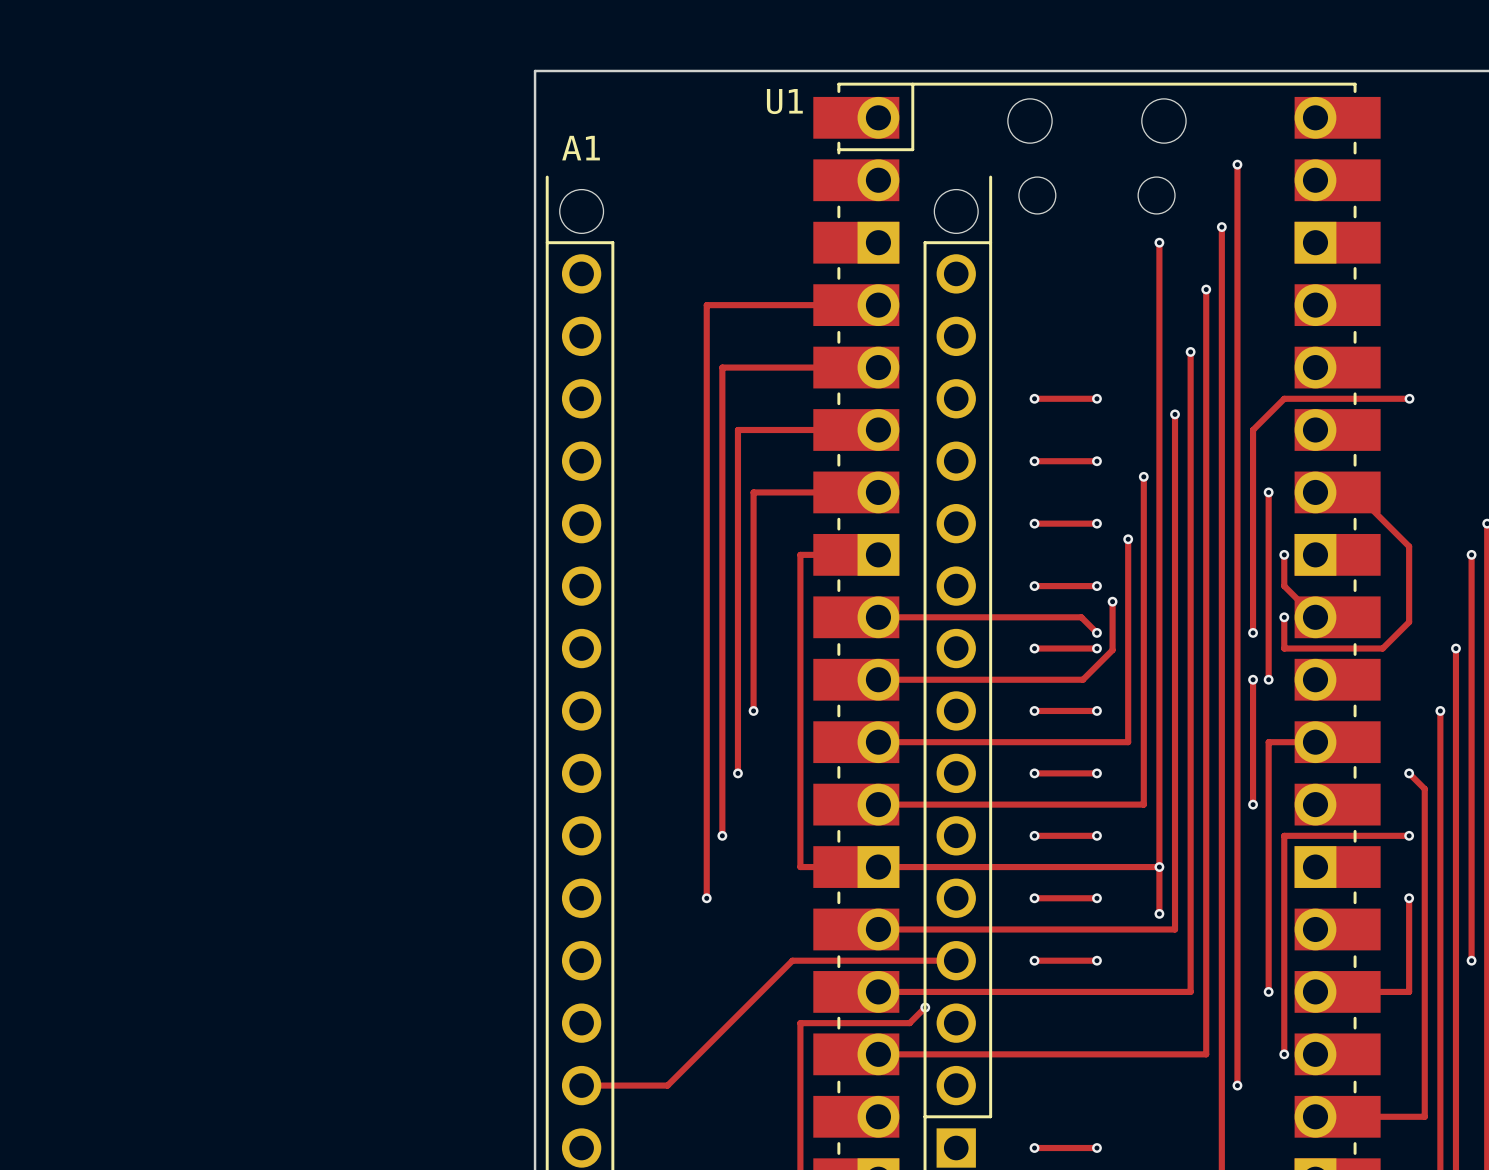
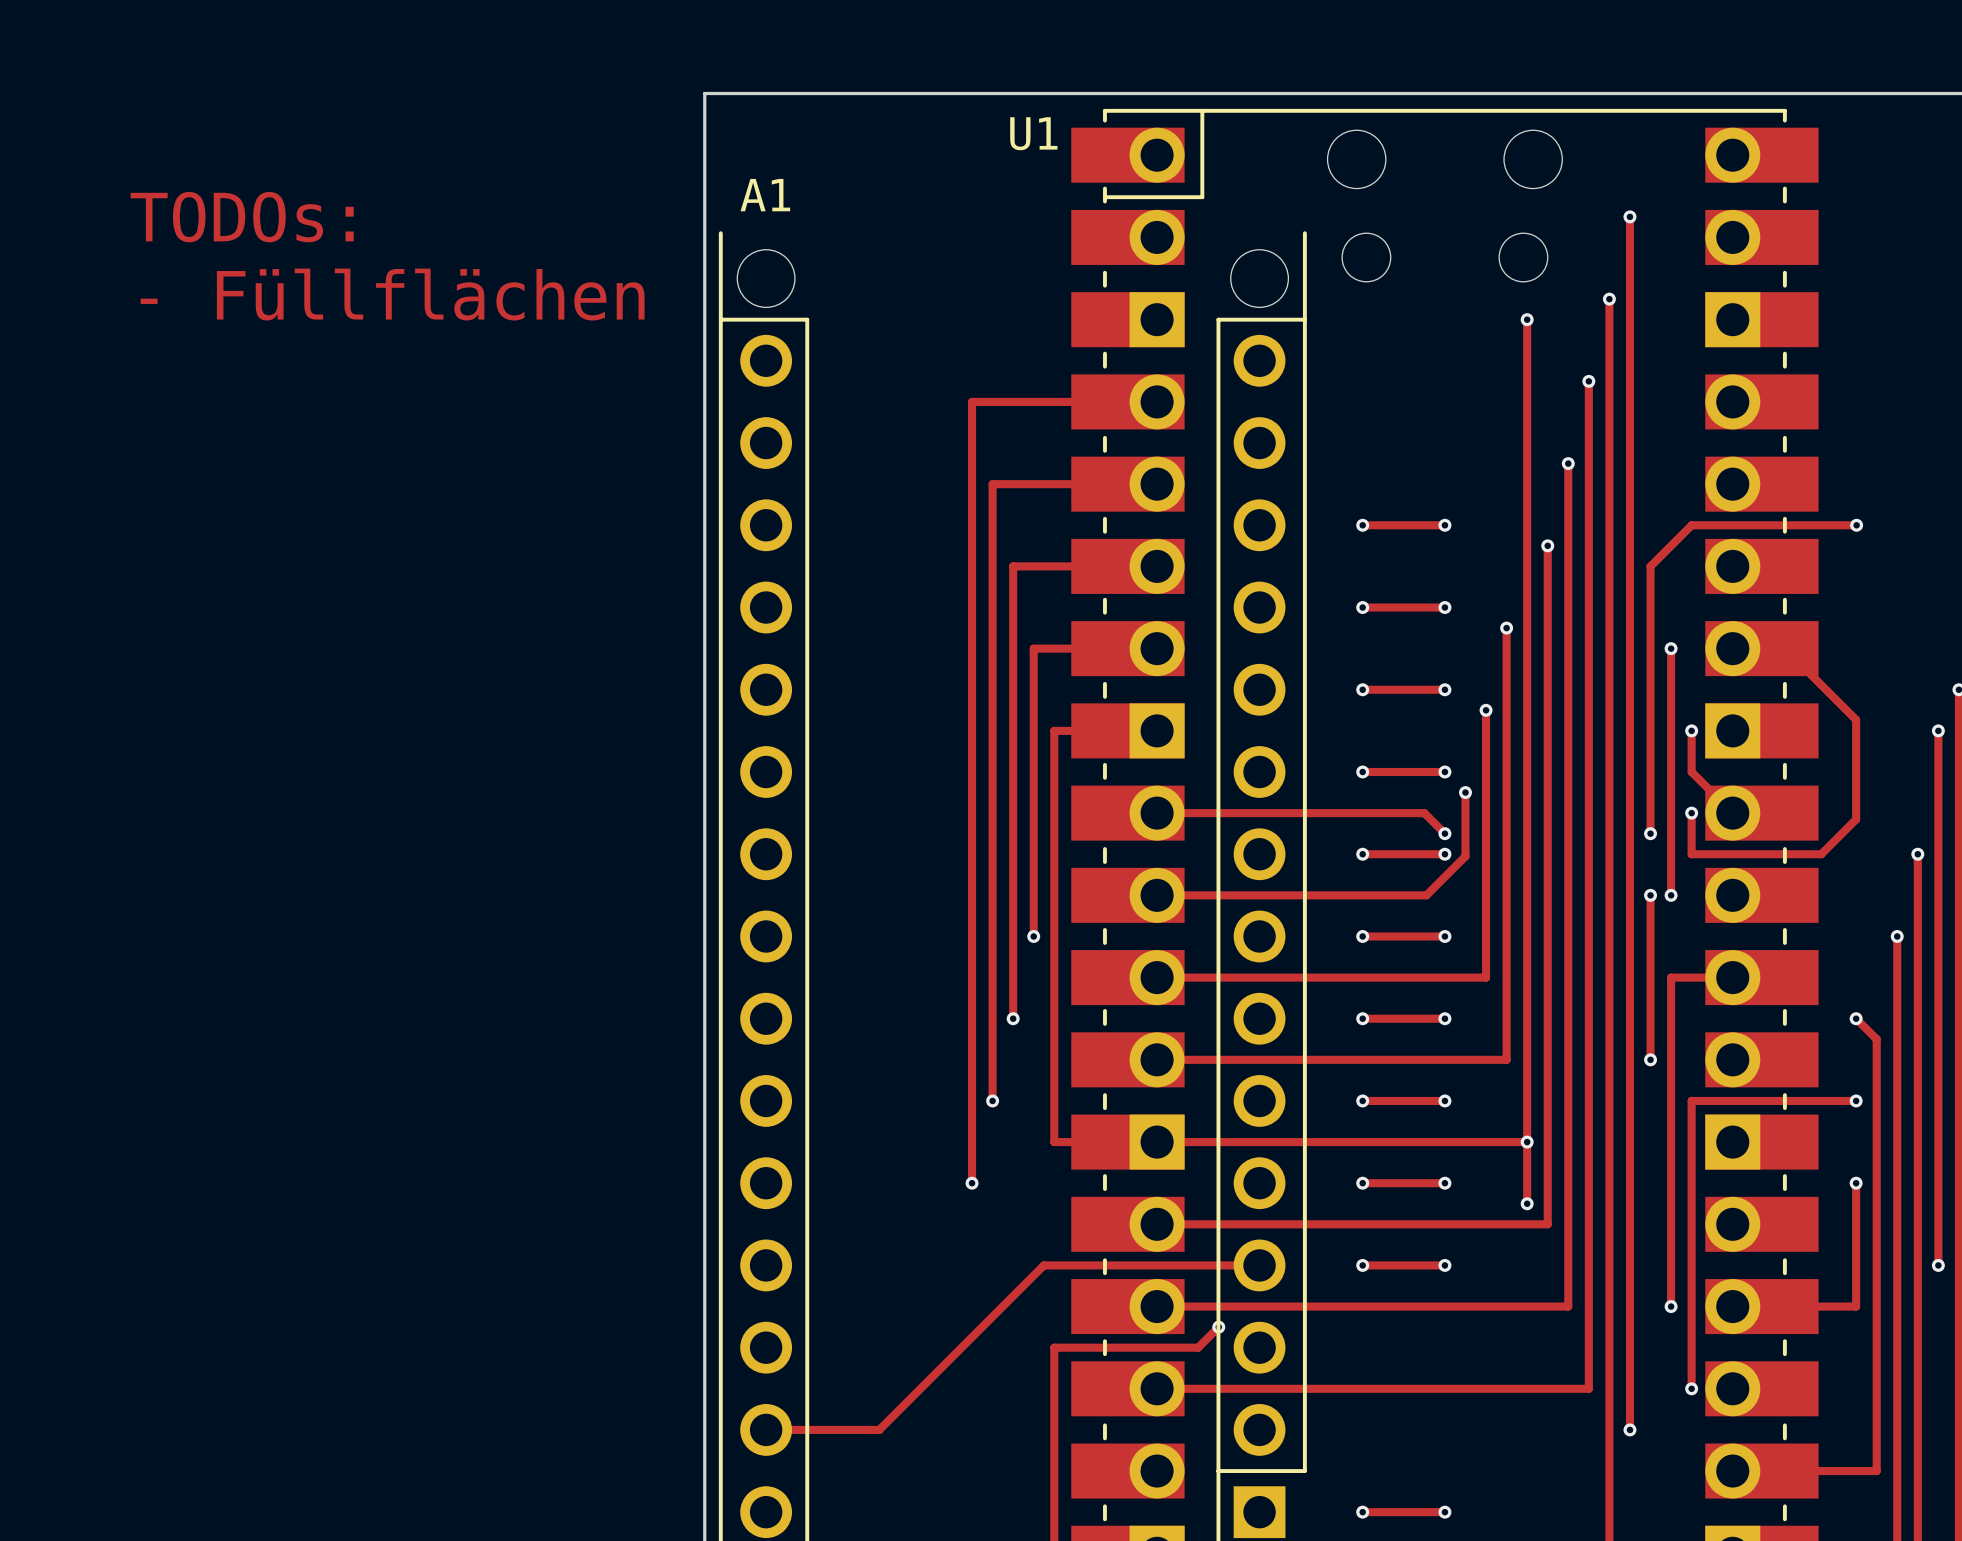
text: none -> TODOs: (242, 217)
text: none -> - Füllflächen (392, 294)
track: (737, 305) (706, 305) (706, 898) -> none
track: (753, 367) (722, 367) (722, 835) -> none
track: (737, 430) (769, 430) -> (972, 566) (972, 401)
track: none -> (1013, 566) (1013, 1018)
track: (753, 492) (784, 492) -> (992, 648) (992, 484)
track: none -> (1033, 648) (1033, 936)
track: none -> (992, 936) (992, 1100)
via position: (753, 710) -> (1033, 936)
track: none -> (972, 1018) (972, 1183)
via position: (737, 773) -> (1013, 1018)
via position: (722, 835) -> (992, 1100)
via position: (706, 898) -> (972, 1183)

